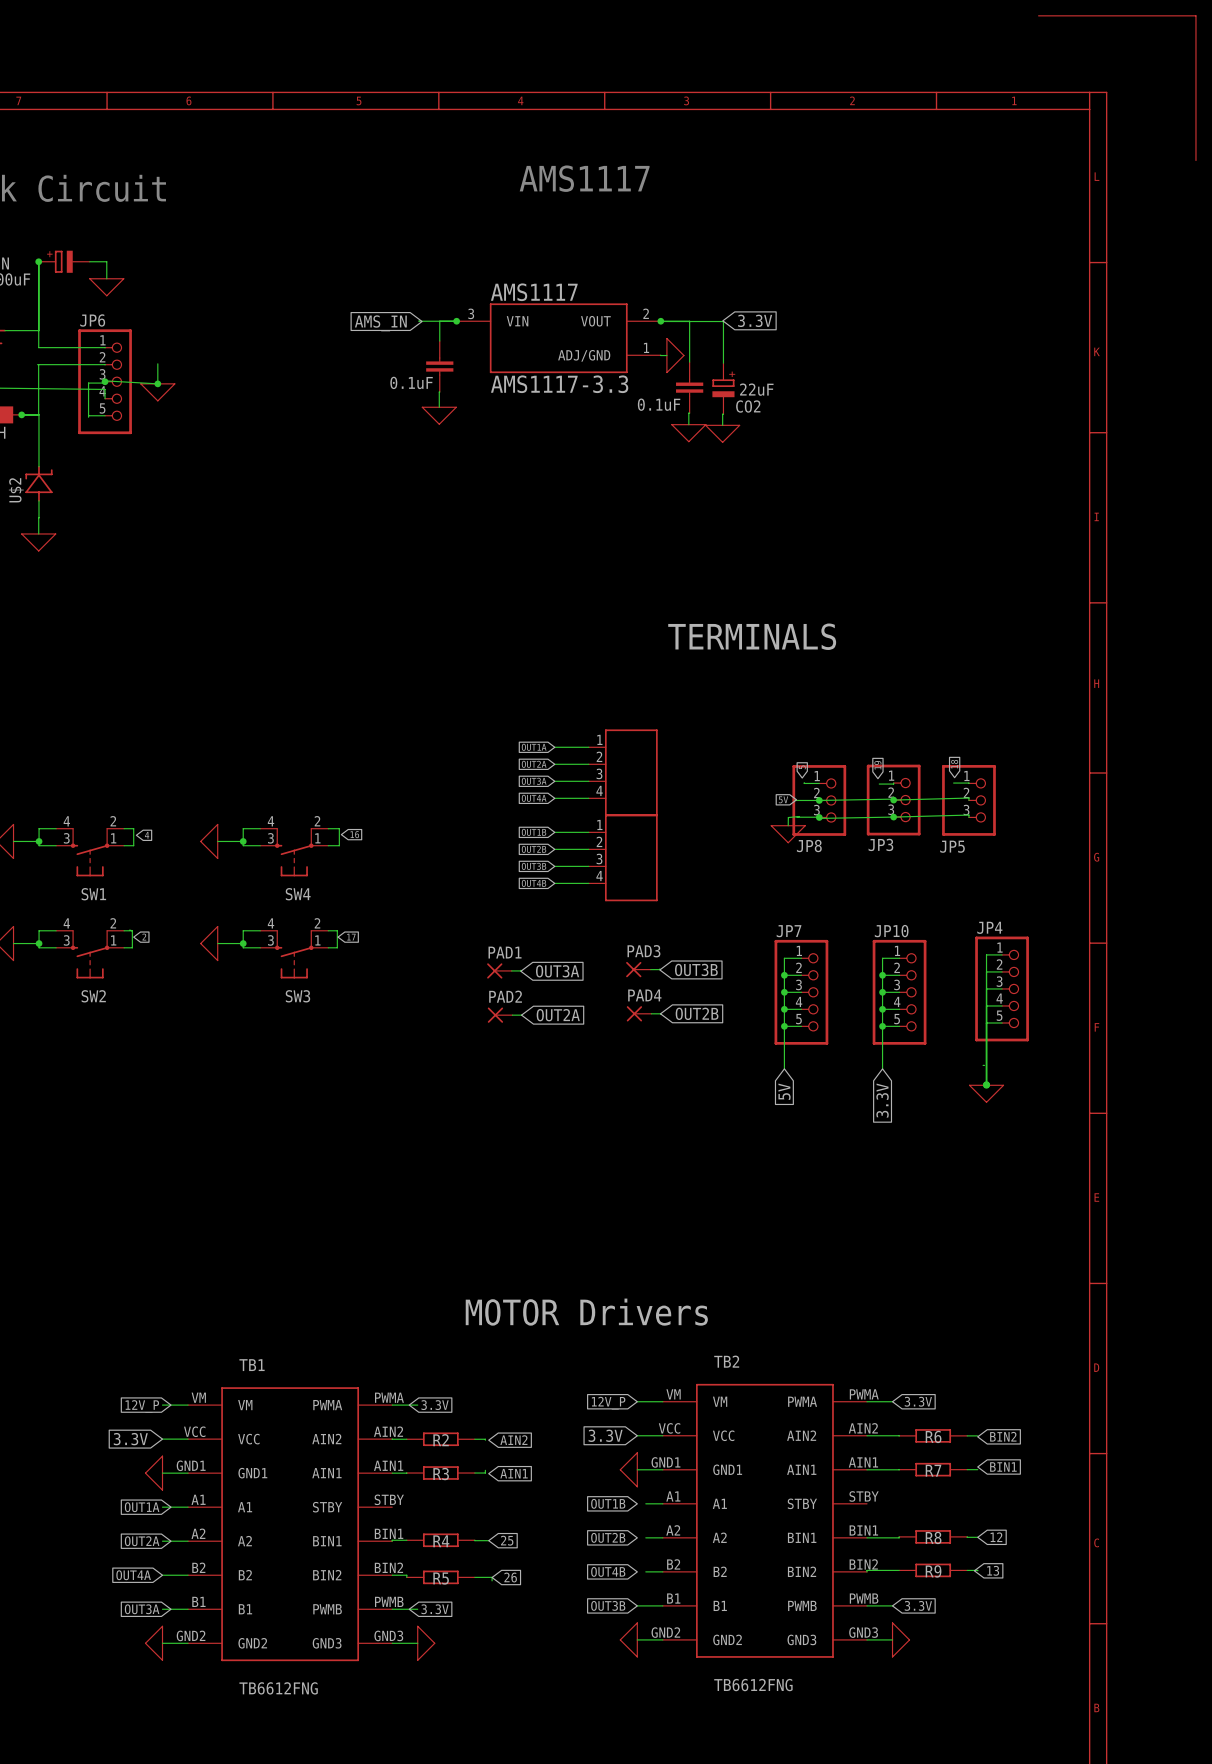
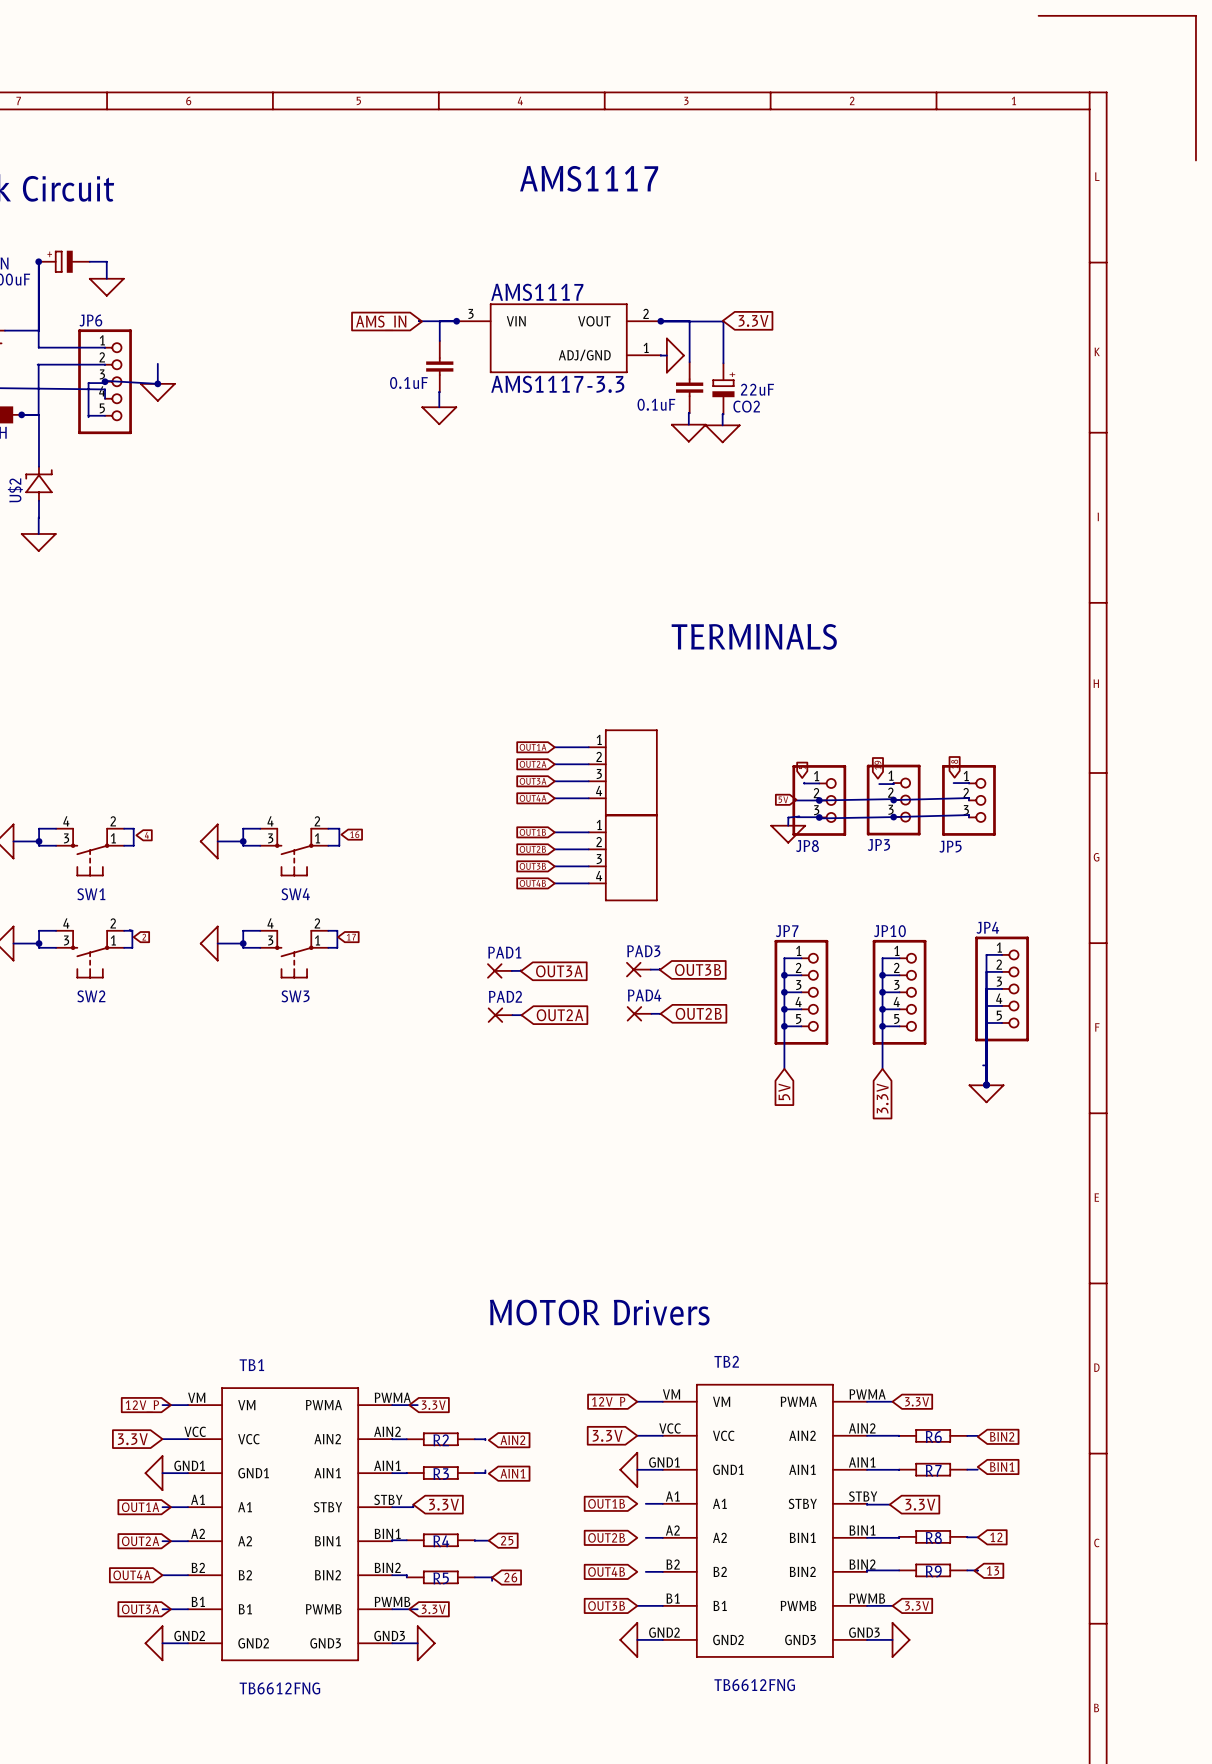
wire: none -> (867, 1503) (889, 1504)
wire: none -> (413, 1504) (413, 1507) (392, 1507)
global label: none -> 3.3V (443, 1504)
global label: none -> 3.3V (920, 1504)

